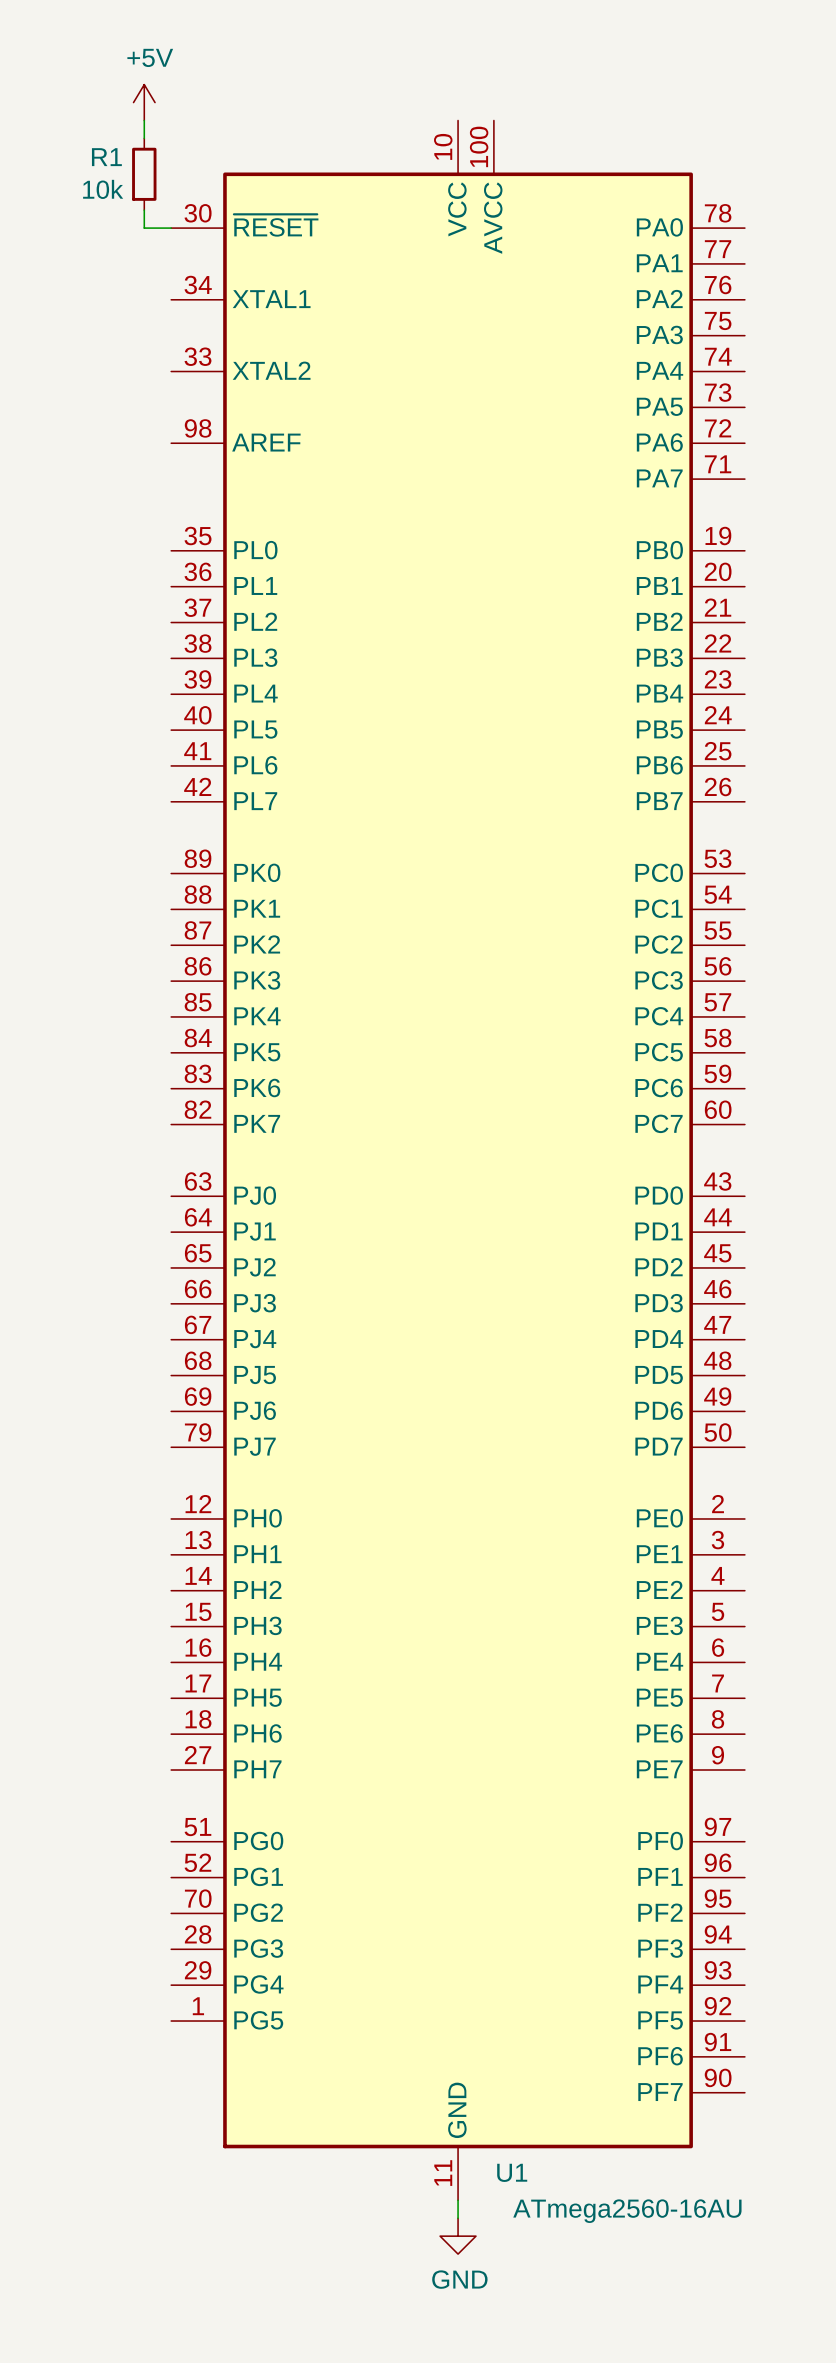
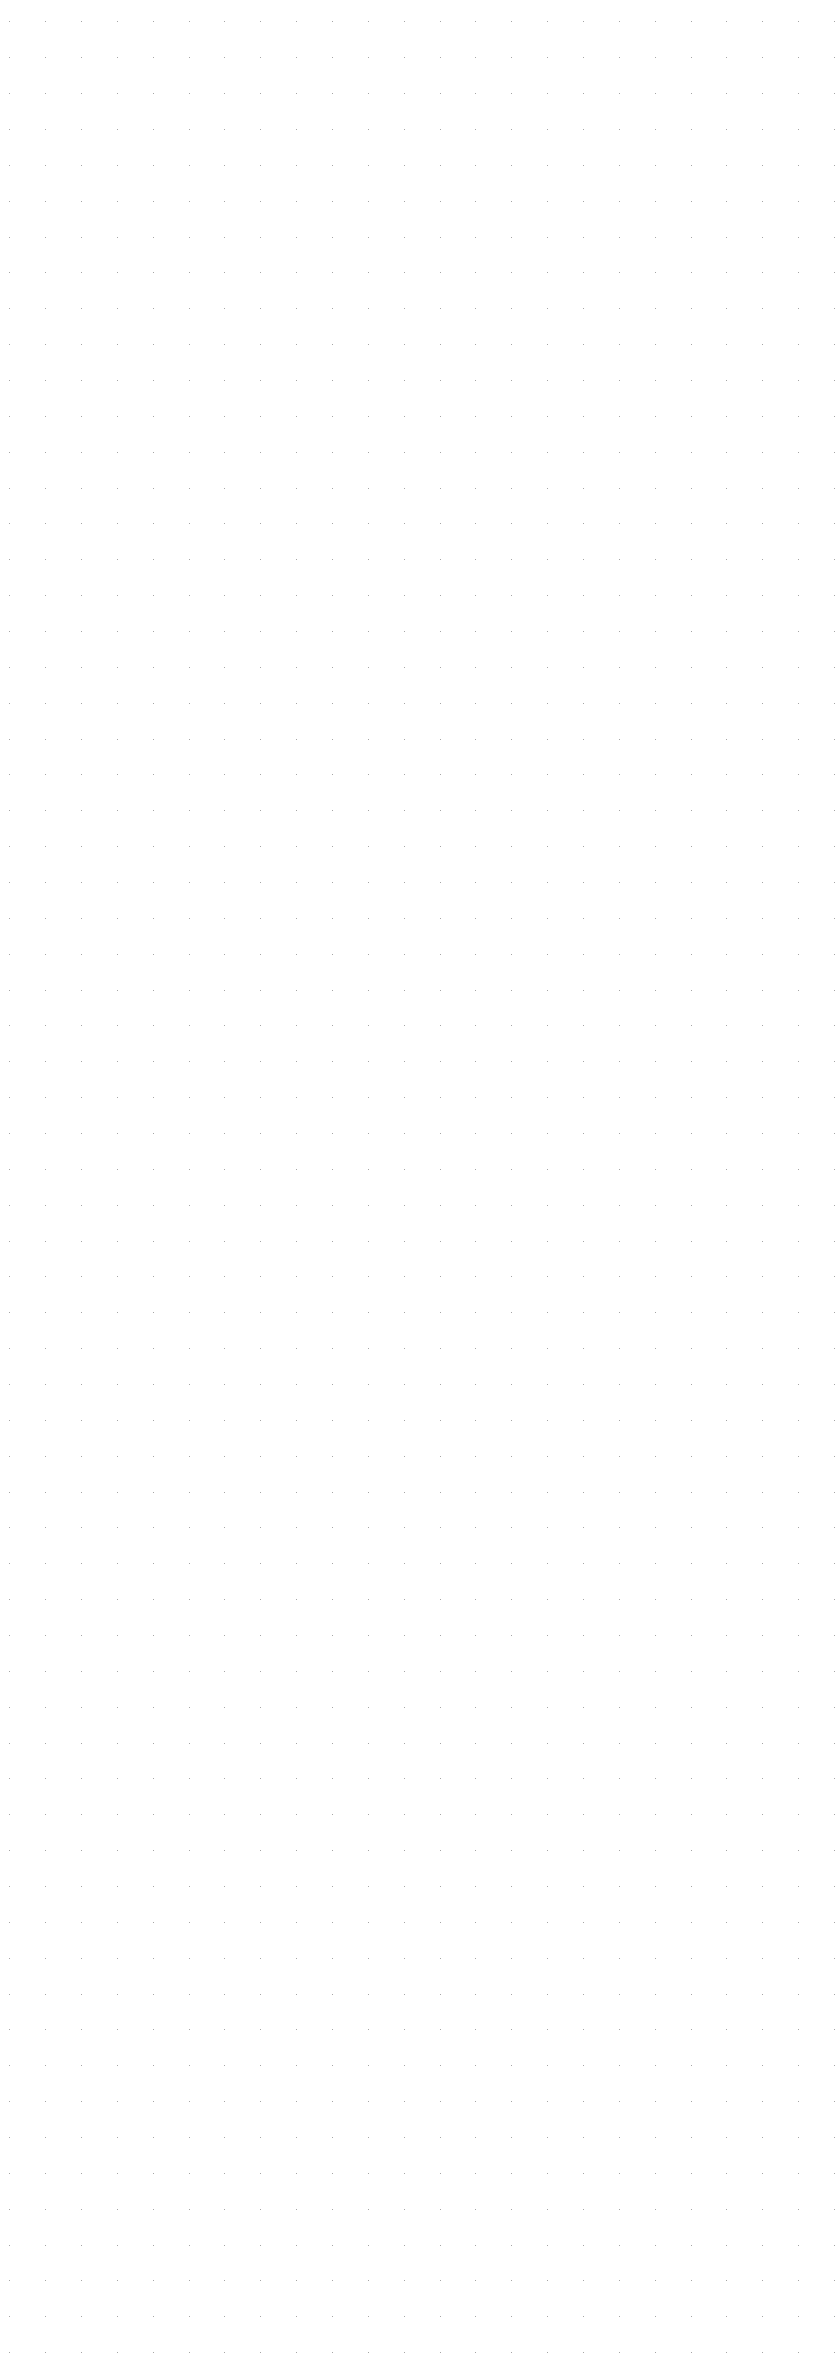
power symbol: +5V (144, 102) -> none
wire: (144, 120) (144, 138) -> none
R1: 10k (144, 174) -> none
wire: (144, 210) (144, 228) (171, 228) -> none
U1: ATmega2560-16AU (458, 1160) -> none
wire: (458, 2200) (458, 2218) -> none
power symbol: GND (458, 2236) -> none

